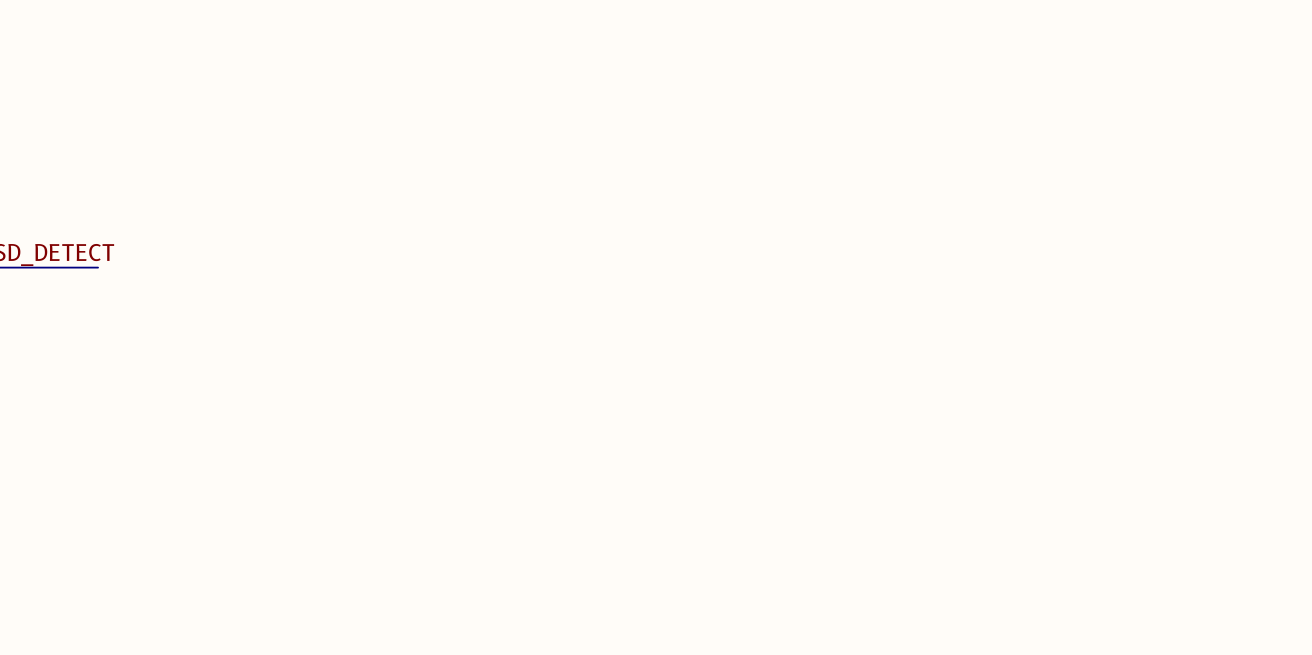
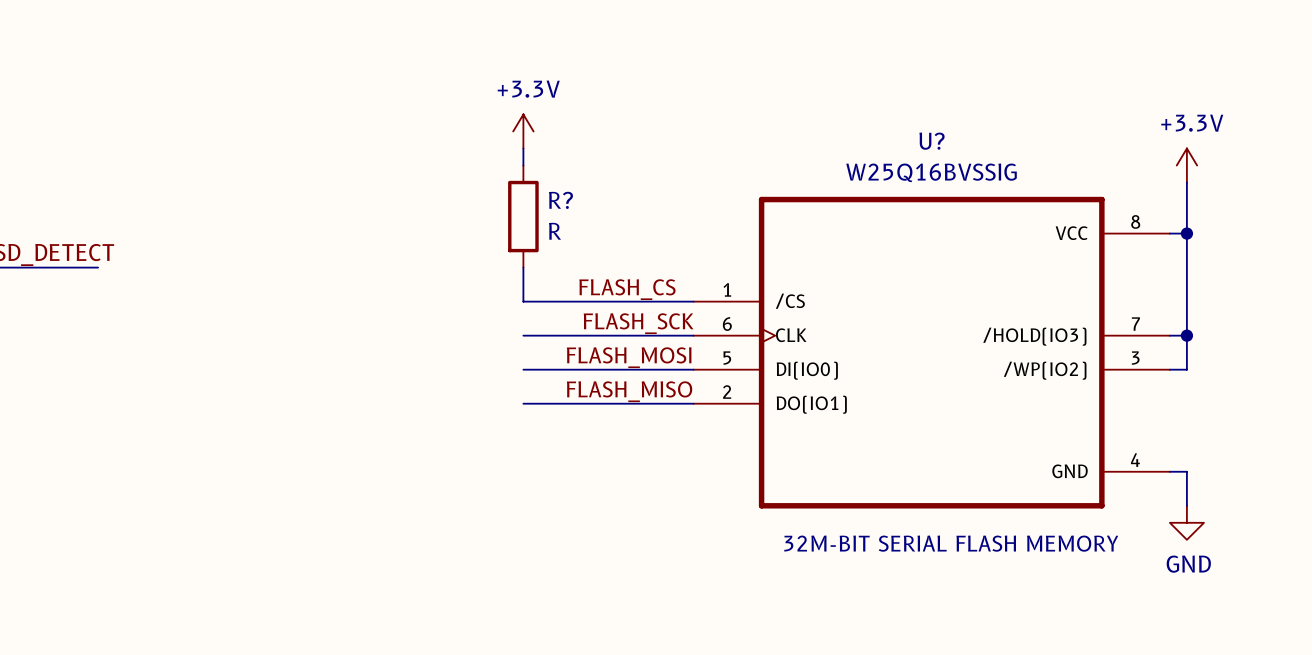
power symbol: none -> +3.3V (523, 131)
wire: none -> (523, 148) (523, 165)
power symbol: none -> +3.3V (1186, 165)
wire: none -> (1186, 182) (1186, 369) (1169, 369)
R?: none -> R (523, 216)
wire: none -> (1169, 233) (1186, 233)
junction: none -> (1186, 233)
wire: none -> (523, 267) (523, 301) (693, 301)
label: none -> FLASH_CS (627, 289)
label: none -> FLASH_SCK (638, 323)
wire: none -> (523, 335) (693, 335)
wire: none -> (1169, 335) (1186, 335)
junction: none -> (1186, 335)
U?: none -> W25Q16BVSSIG (931, 352)
label: none -> FLASH_MOSI (629, 357)
wire: none -> (523, 369) (693, 369)
label: none -> FLASH_MISO (629, 391)
wire: none -> (523, 403) (693, 403)
wire: none -> (1169, 471) (1186, 471) (1186, 505)
power symbol: none -> GND (1186, 522)
text: none -> 32M-BIT SERIAL FLASH MEMORY (951, 543)

